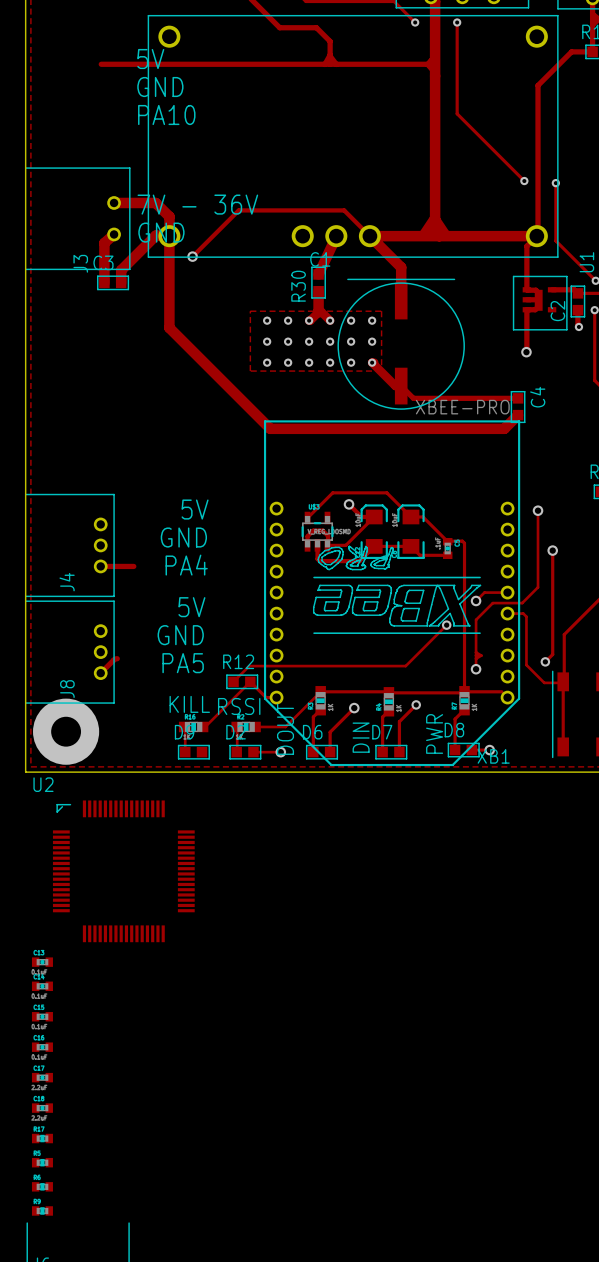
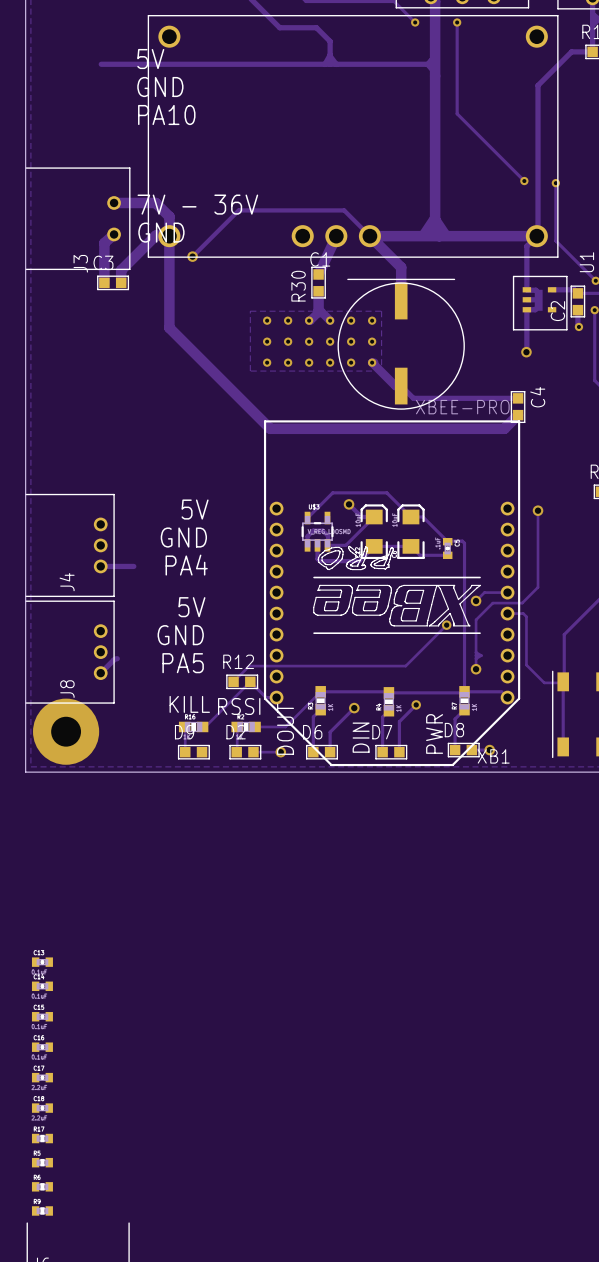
track: (552, 550) (552, 654) (545, 661) -> none
via: (552, 550) -> none
via: (545, 661) -> none
U2: (123, 871) -> none

